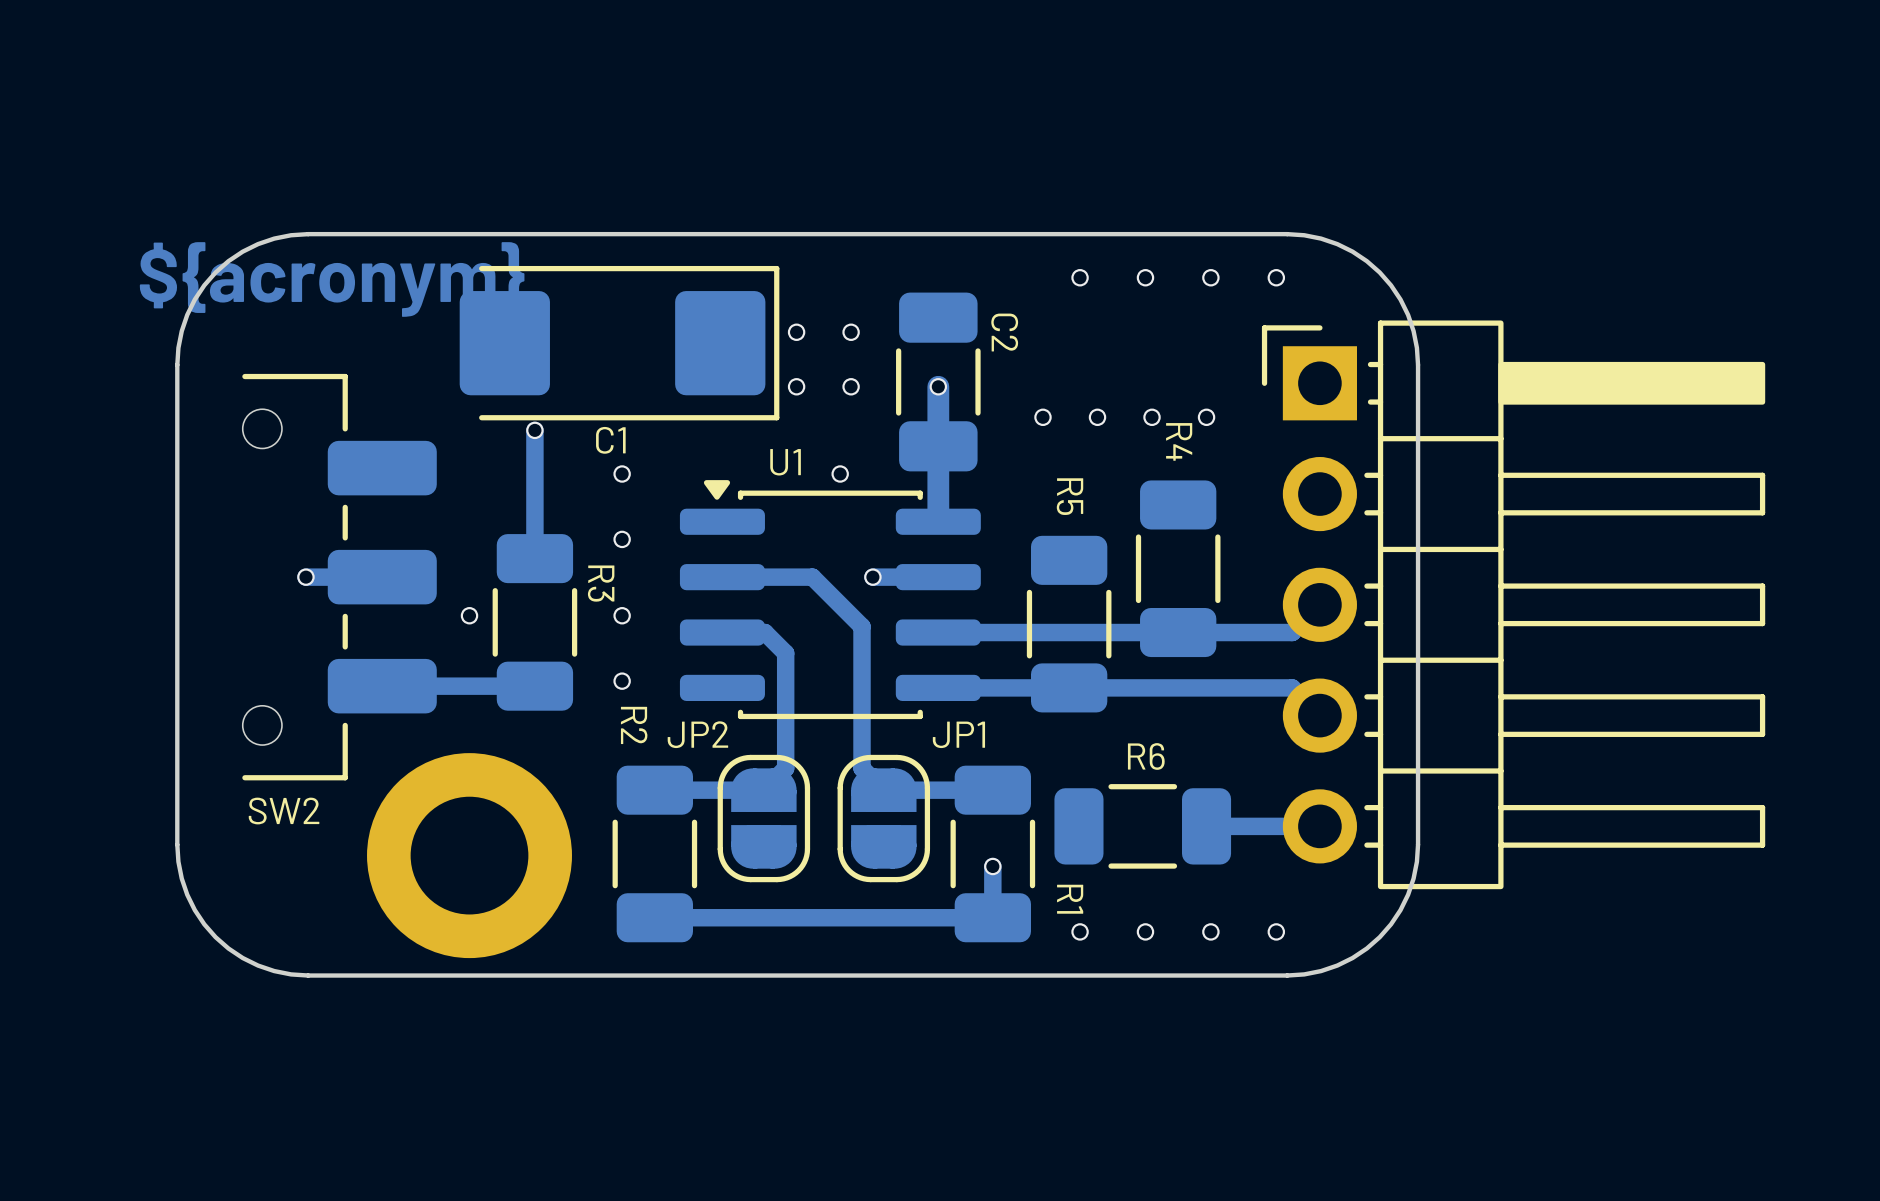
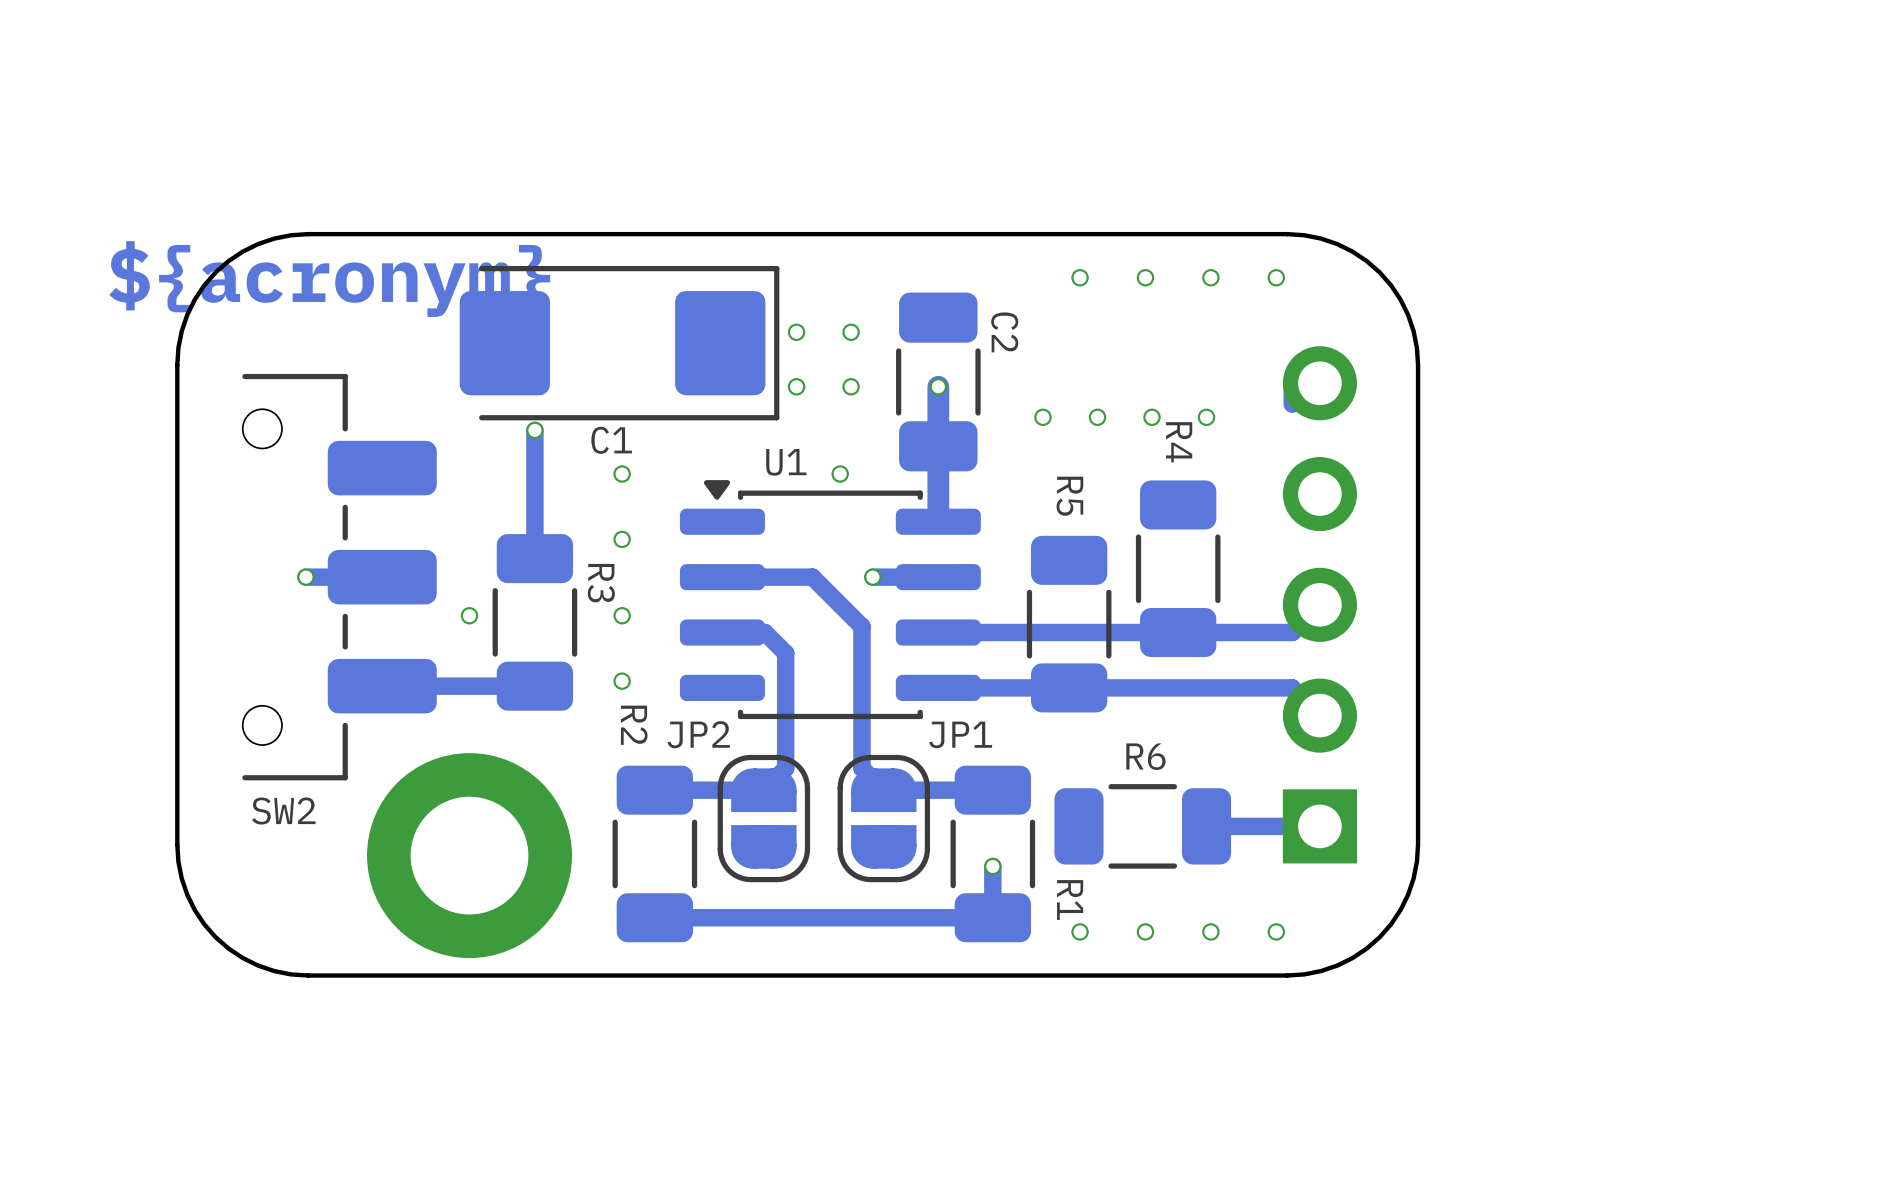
part side: bottom (1513, 604) -> top (1319, 604)

